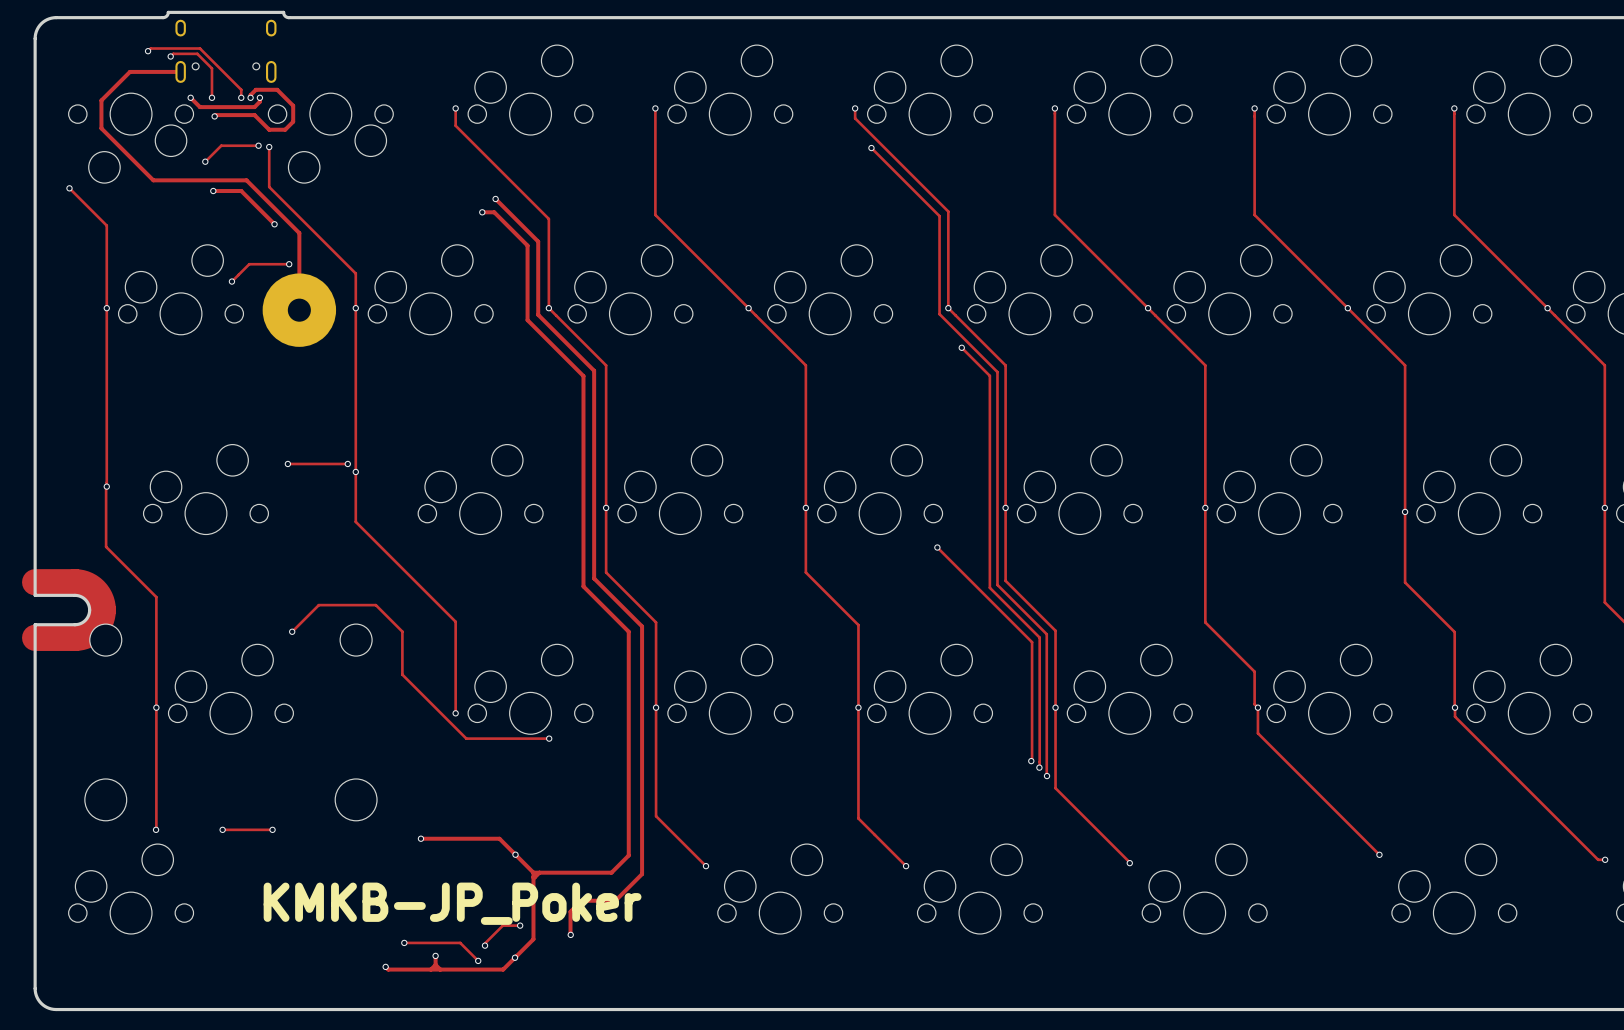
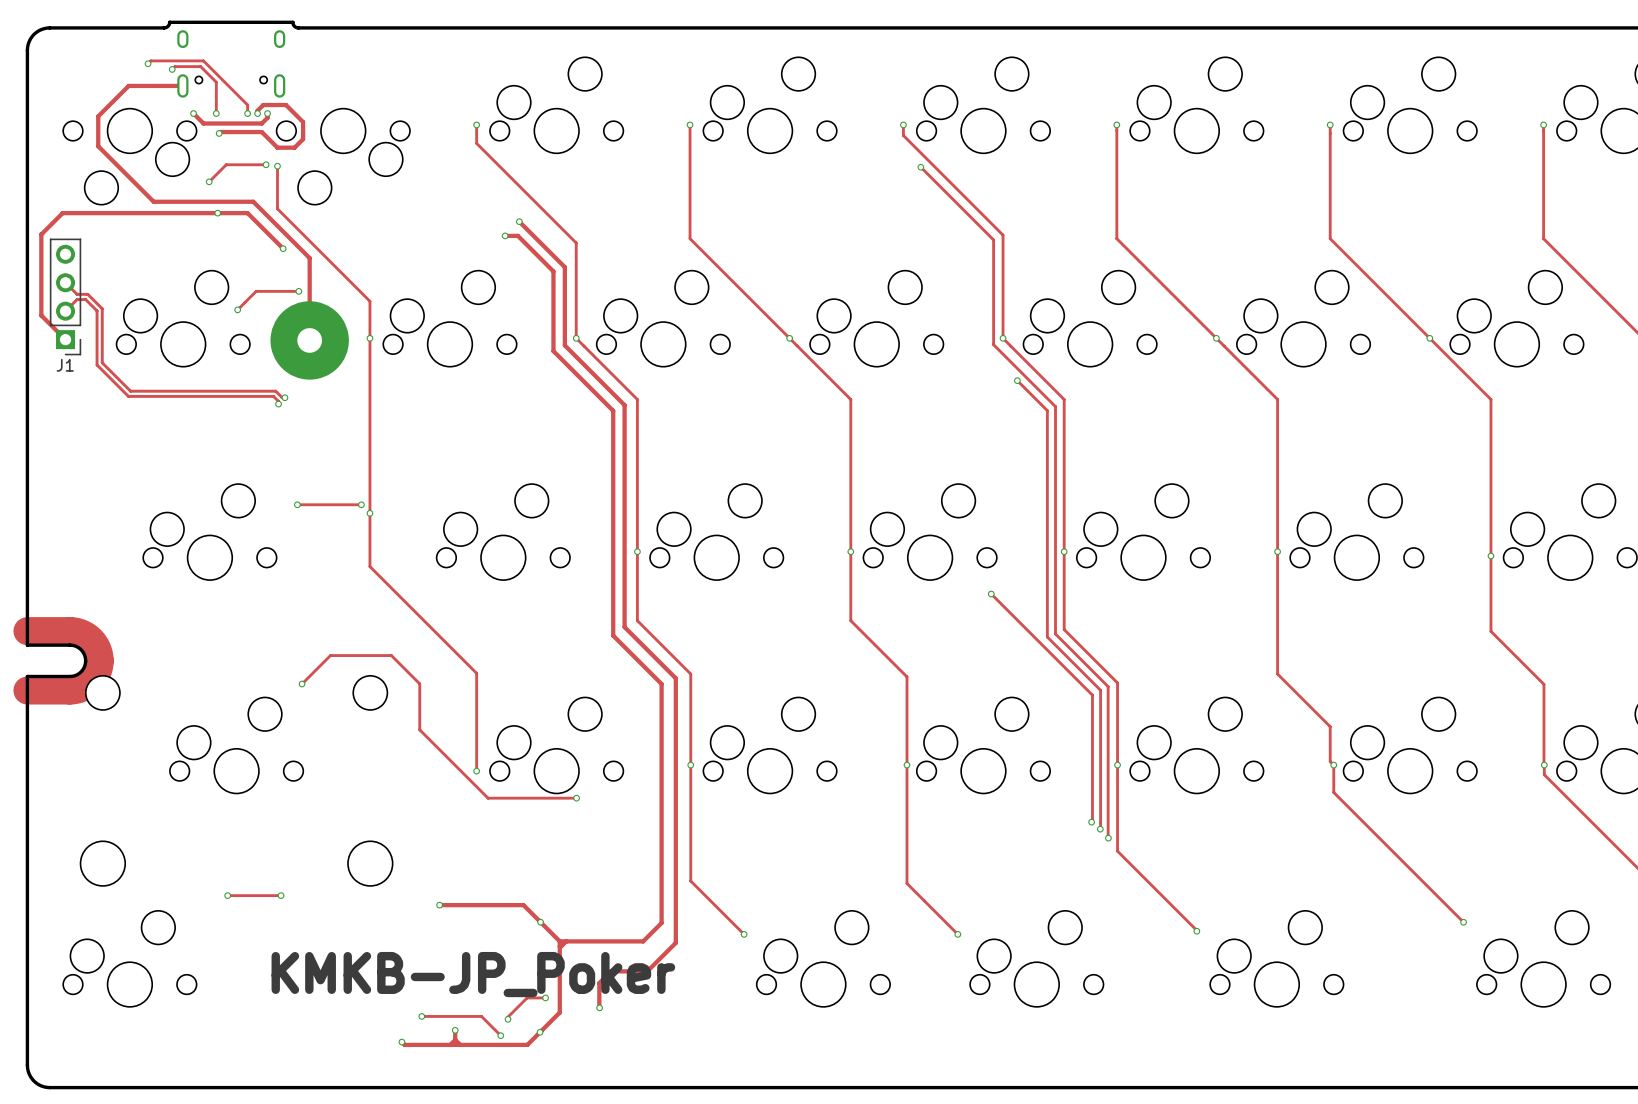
track: (69, 188) (106, 225) (106, 546) (156, 597) (156, 829) -> none
via: (69, 188) -> none
track: none -> (217, 213) (62, 213) (41, 234) (41, 315) (65, 339)
track: none -> (65, 282) (77, 294) (87, 294) (102, 308) (102, 362) (130, 391) (275, 391) (282, 397) (284, 397)
J1: none -> (65, 296)
track: none -> (65, 311) (77, 299) (85, 299) (97, 310) (97, 365) (128, 396) (273, 396) (278, 404)
via: (106, 308) -> none
via: none -> (284, 397)
via: none -> (278, 404)
via: (106, 486) -> none
via: (156, 707) -> none
via: (156, 829) -> none

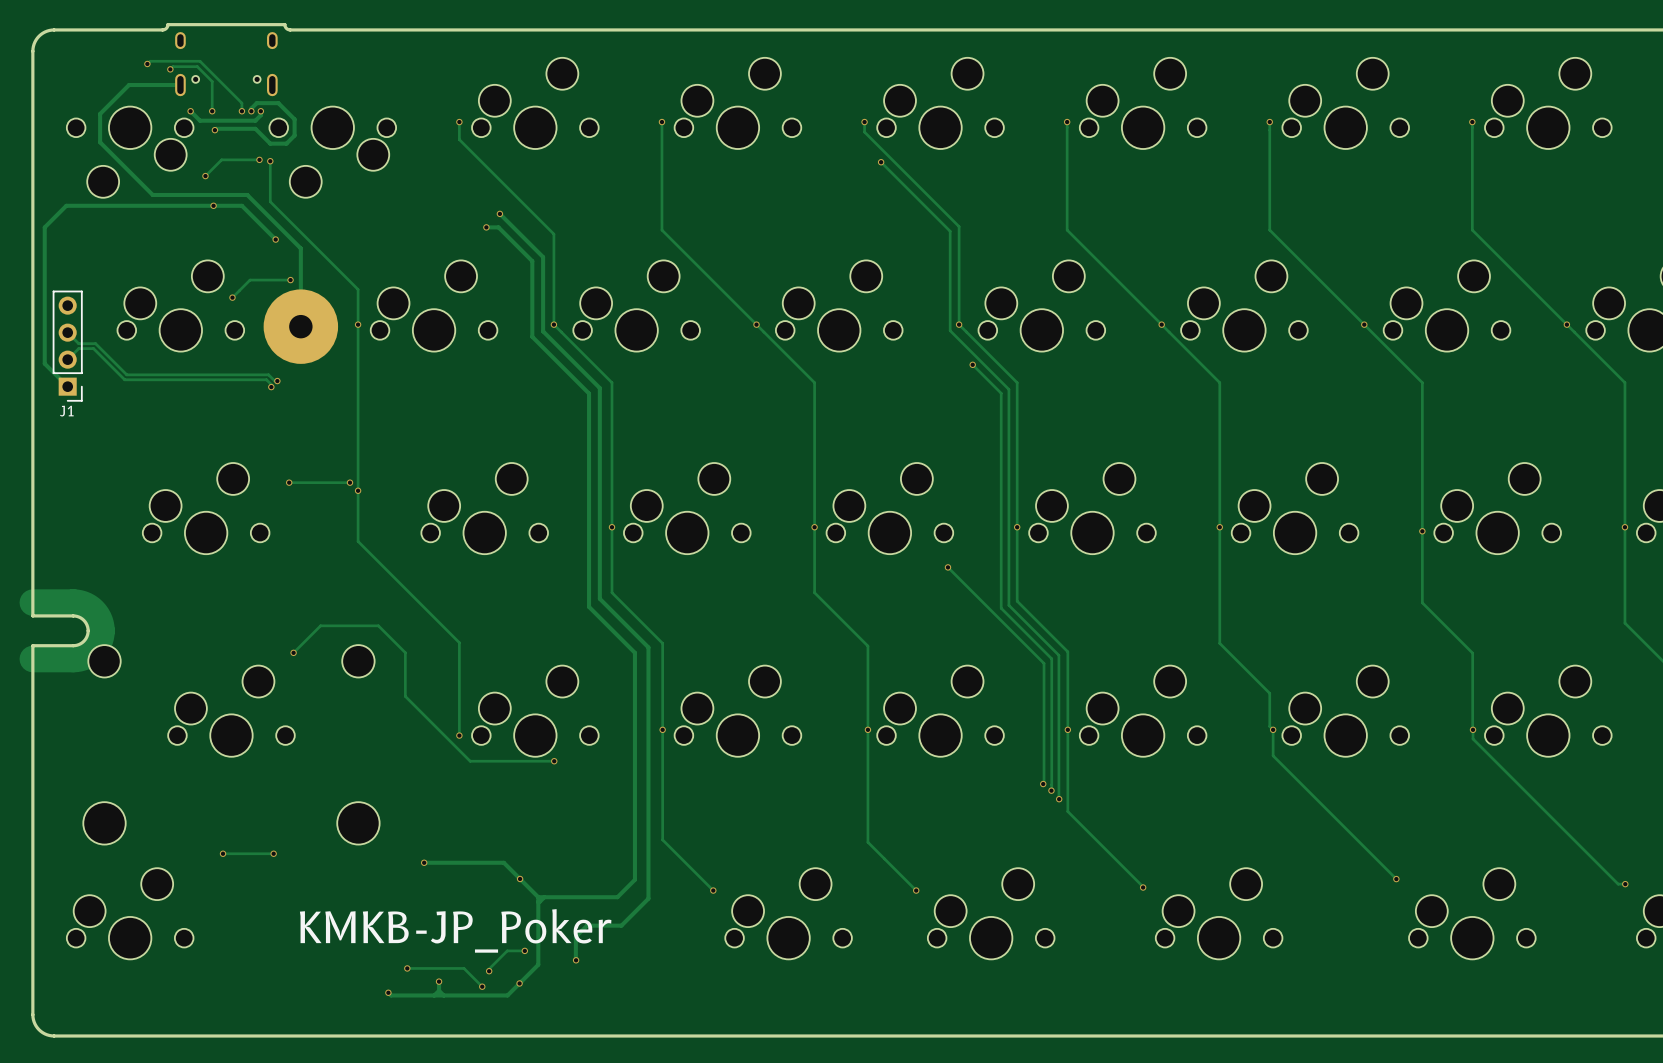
track: (41, 234) (41, 315) (65, 339) -> (46, 226) (44, 363) (67, 386)
track: (65, 282) (77, 294) (87, 294) (102, 308) (102, 362) (130, 391) -> (67, 332) (78, 343) (95, 343) (126, 374) (130, 374)
J1 position: (65, 296) -> (67, 346)
track: (65, 311) (77, 299) (85, 299) (97, 310) (97, 365) (128, 396) -> (67, 359) (78, 348) (93, 348) (124, 379) (128, 379)

